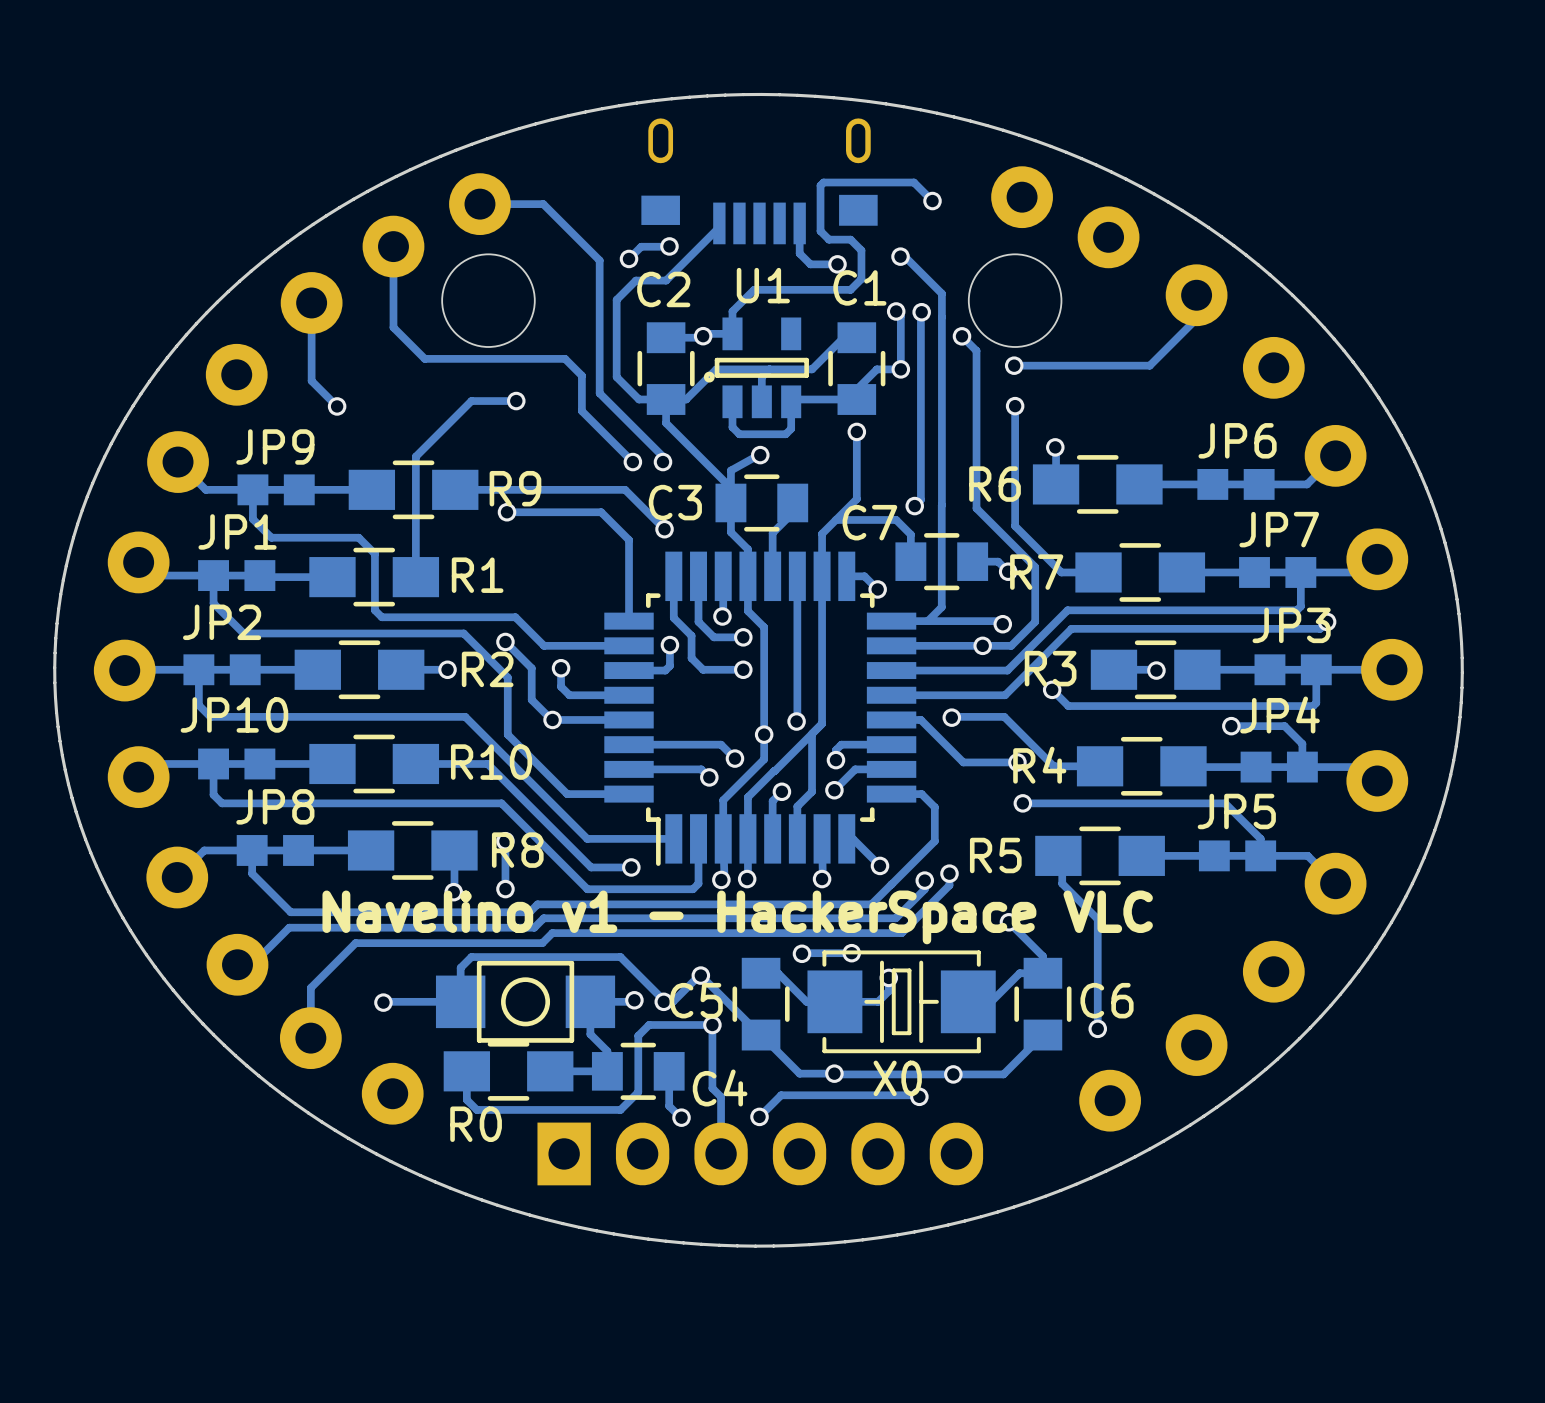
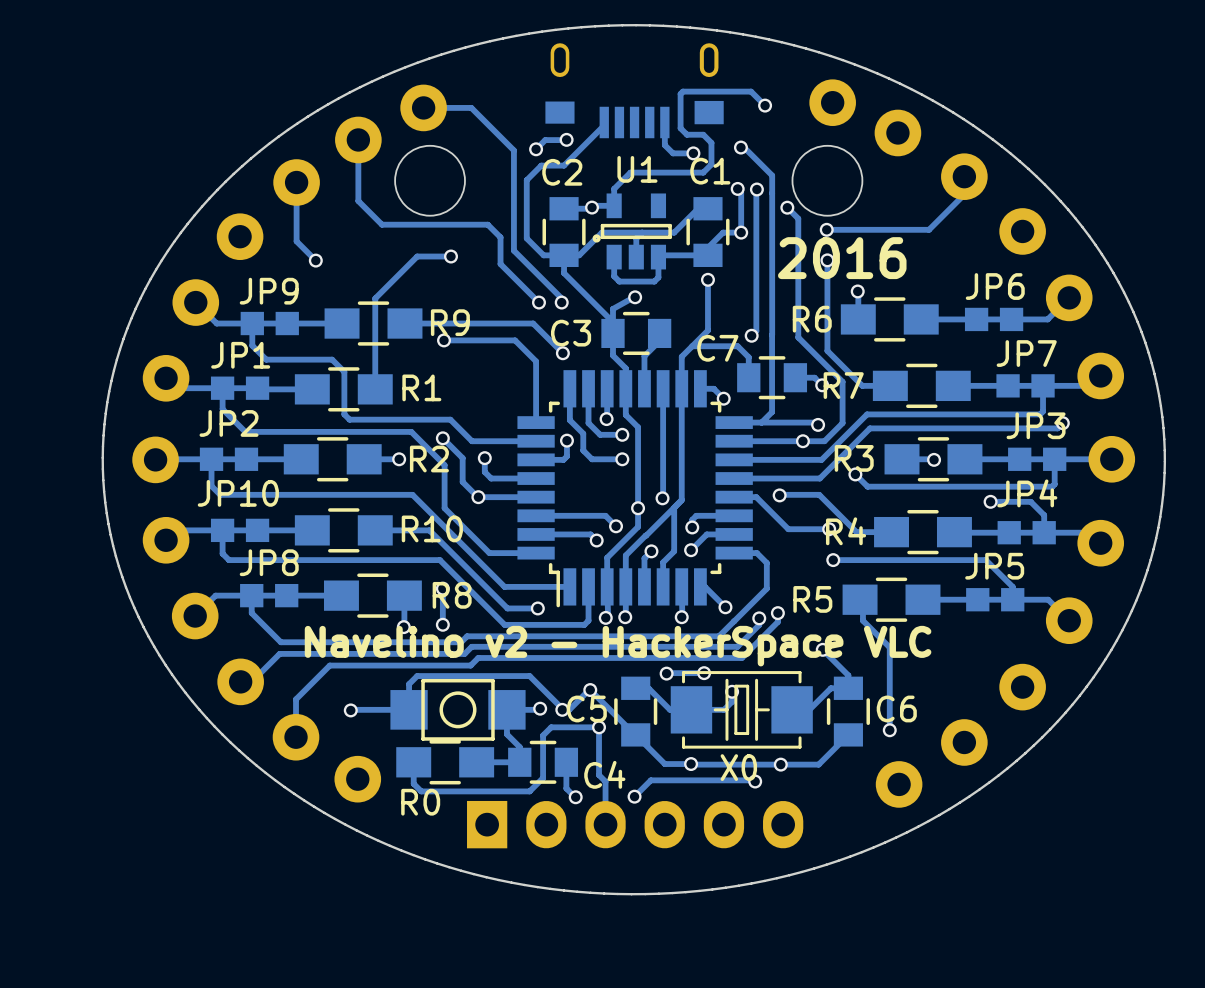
text: none -> 2016 (842, 258)
text: Navelino v1 - HackerSpace VLC (737, 917) -> Navelino v2 - HackerSpace VLC (618, 646)

